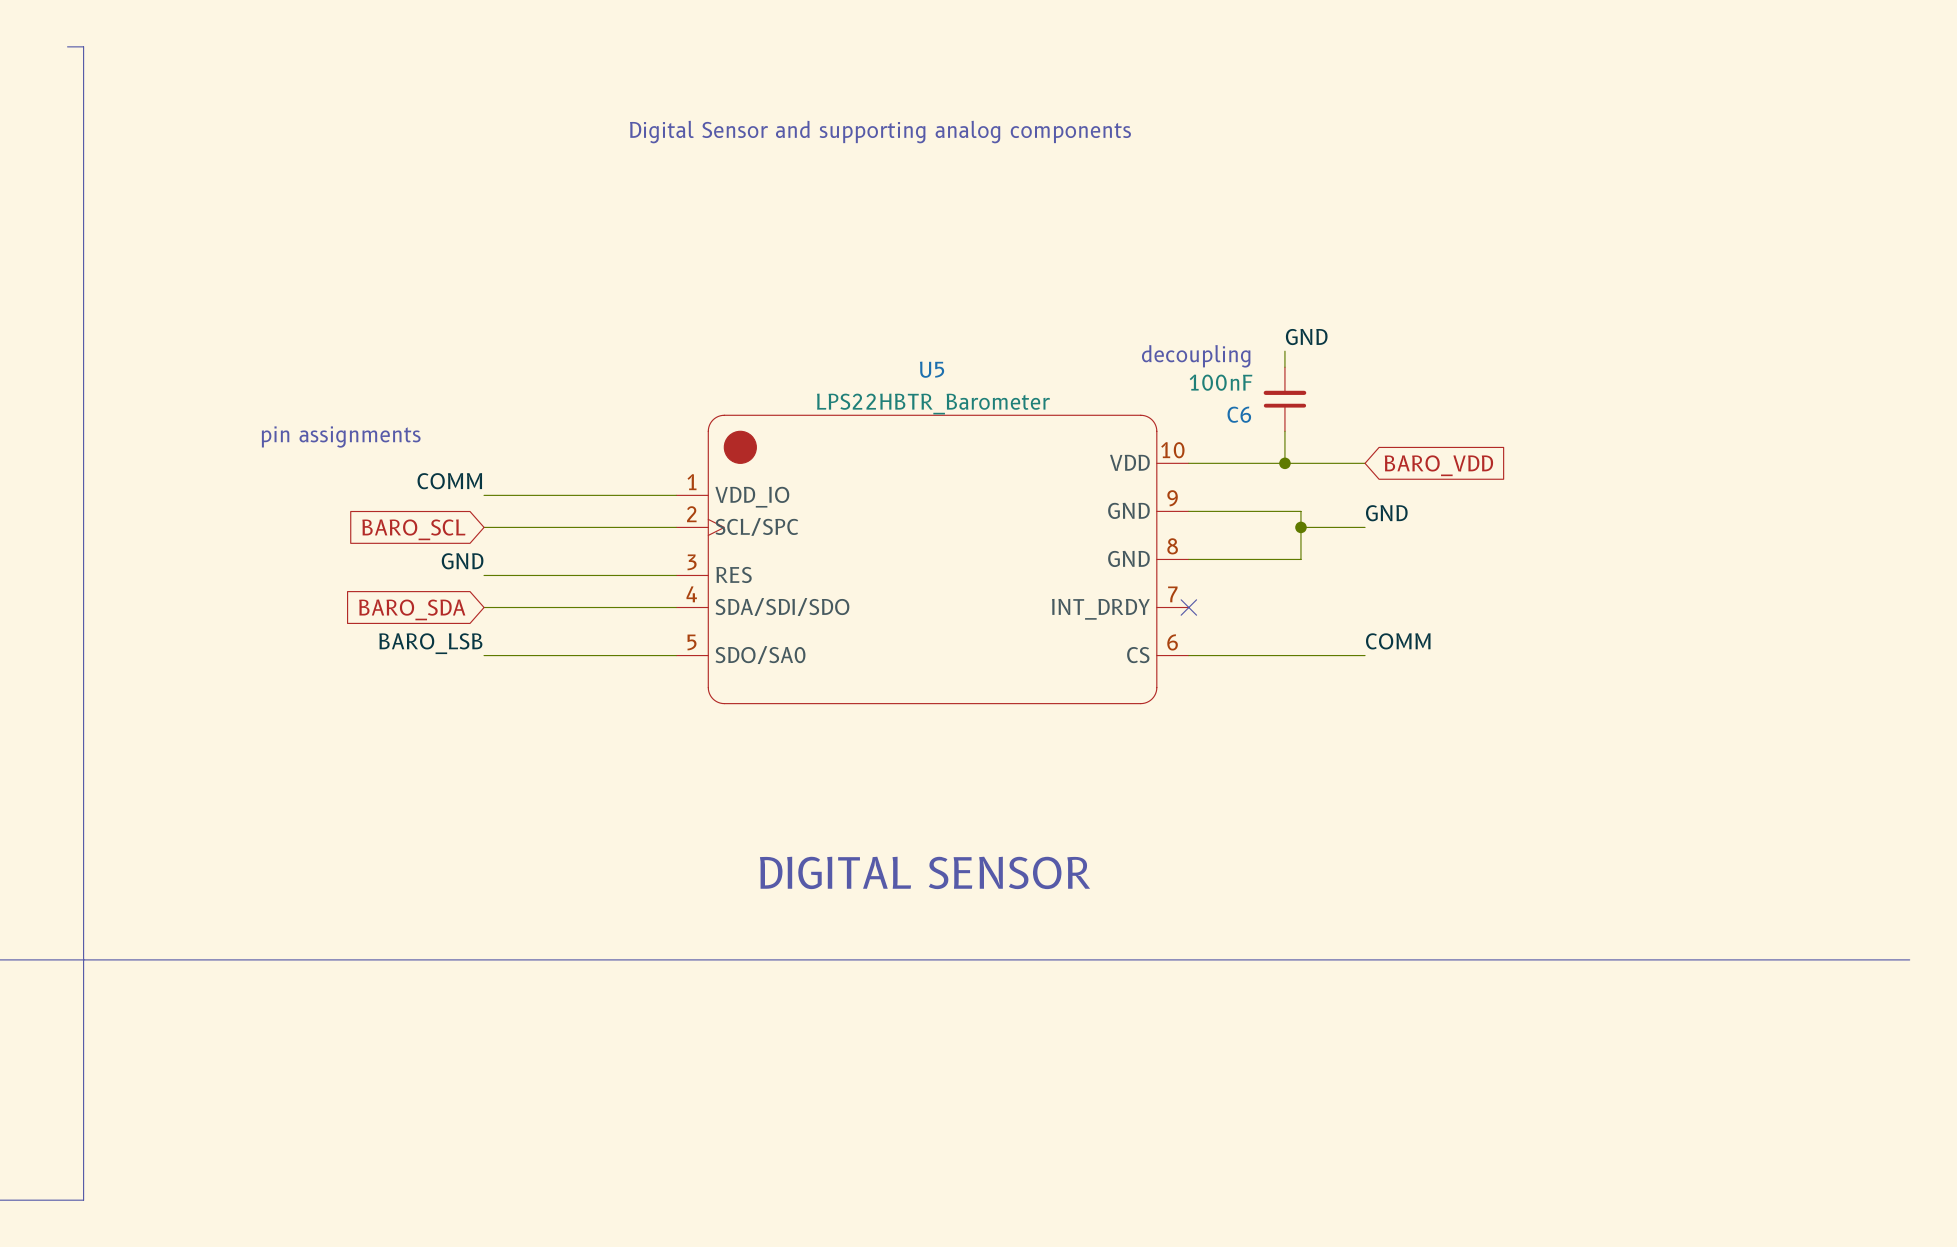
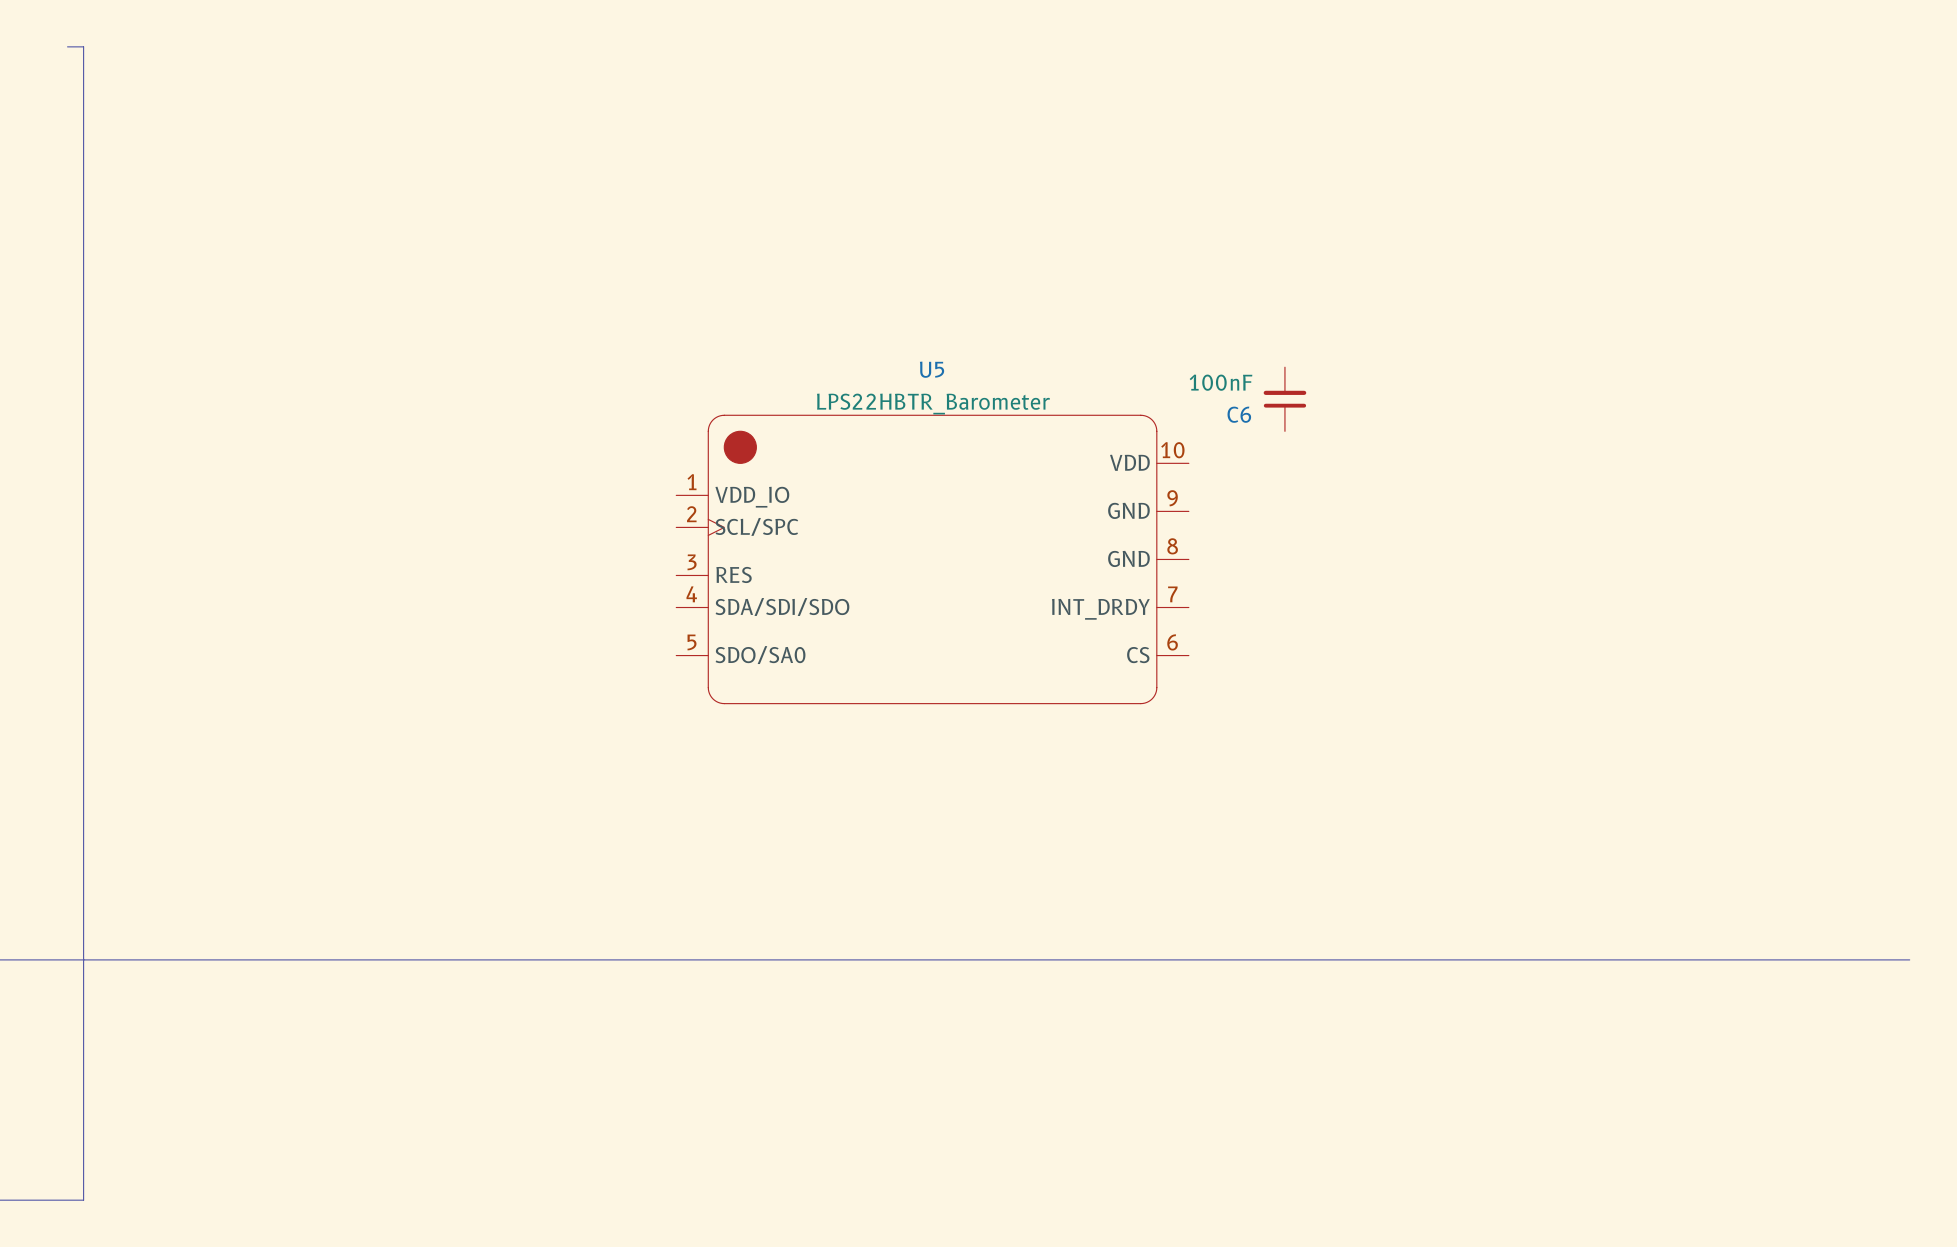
text: Digital Sensor and supporting analog components (880, 132) -> none
label: GND (1306, 337) -> none
wire: (1284, 351) (1284, 367) -> none
text: decoupling (1196, 356) -> none
wire: (1284, 431) (1284, 463) -> none
text: pin assignments (341, 437) -> none
wire: (1188, 463) (1365, 463) -> none
junction: (1284, 463) -> none
global label: BARO_VDD (1438, 465) -> none
label: COMM (449, 481) -> none
wire: (484, 495) (676, 495) -> none
wire: (1188, 511) (1300, 511) (1300, 559) (1188, 559) -> none
label: GND (1386, 513) -> none
wire: (484, 527) (676, 527) -> none
wire: (1300, 527) (1365, 527) -> none
junction: (1300, 527) -> none
global label: BARO_SCL (413, 529) -> none
label: GND (462, 561) -> none
wire: (484, 575) (676, 575) -> none
wire: (484, 607) (676, 607) -> none
no-connect mark: (1188, 607) -> none
global label: BARO_SDA (412, 609) -> none
label: COMM (1398, 641) -> none
label: BARO_LSB (430, 643) -> none
wire: (484, 655) (676, 655) -> none
wire: (1188, 655) (1365, 655) -> none
text: DIGITAL SENSOR (925, 872) -> none

